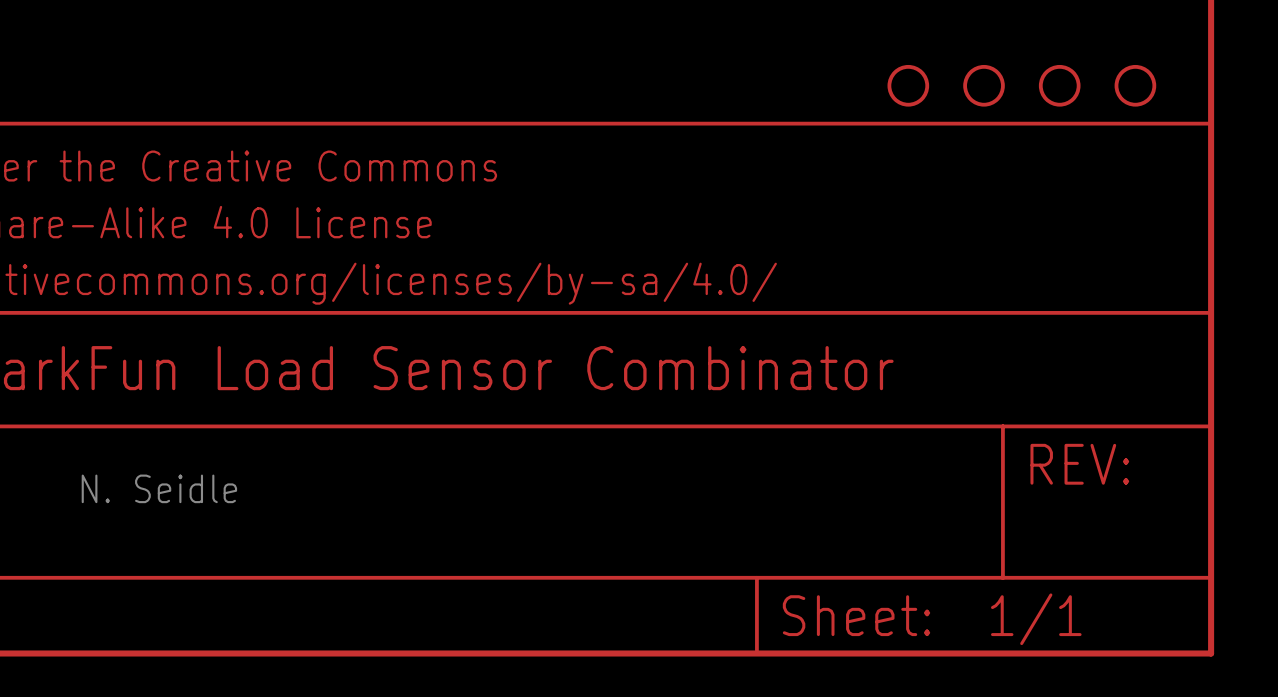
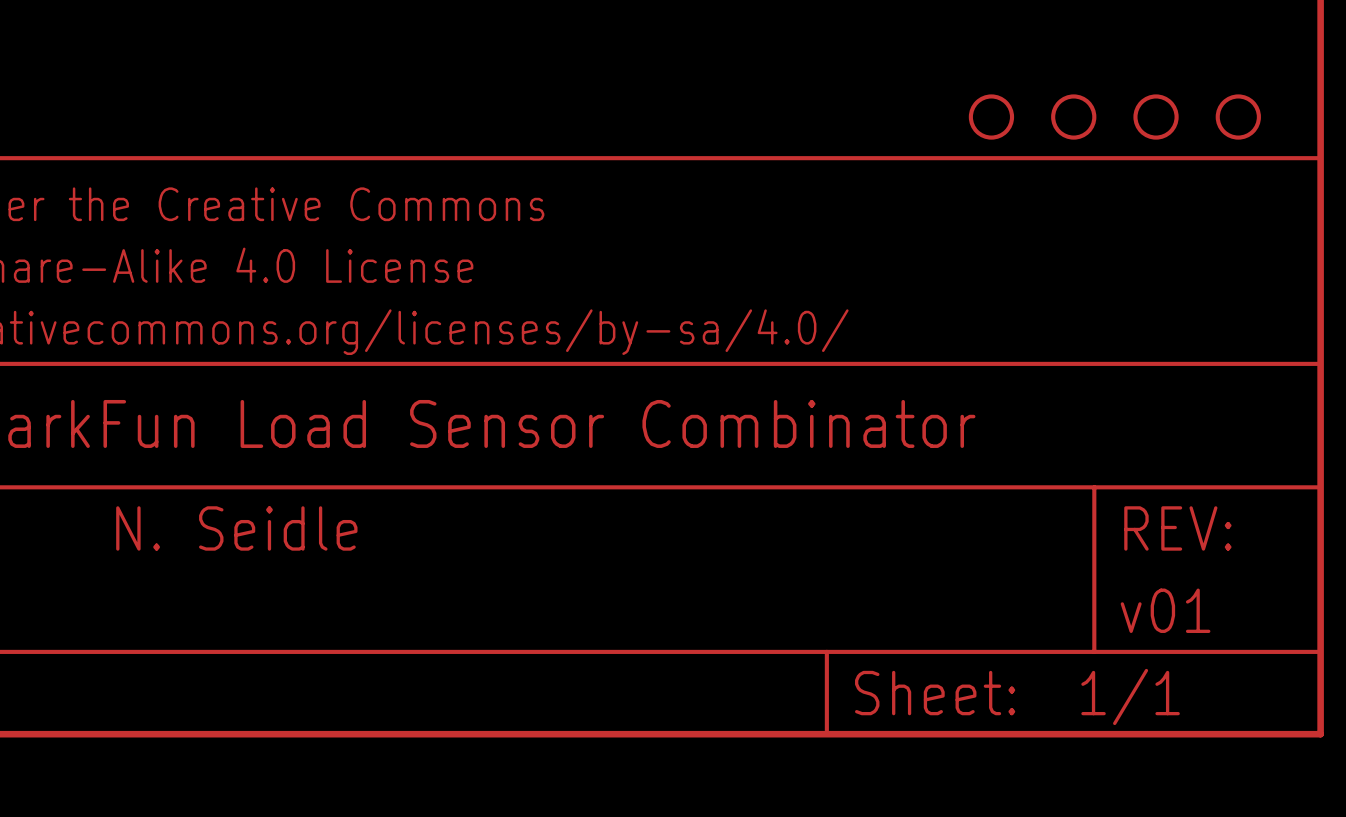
part text: none -> N. Seidle (236, 528)
text: N. Seidle (159, 488) -> none
part text: none -> v01 (1165, 610)

